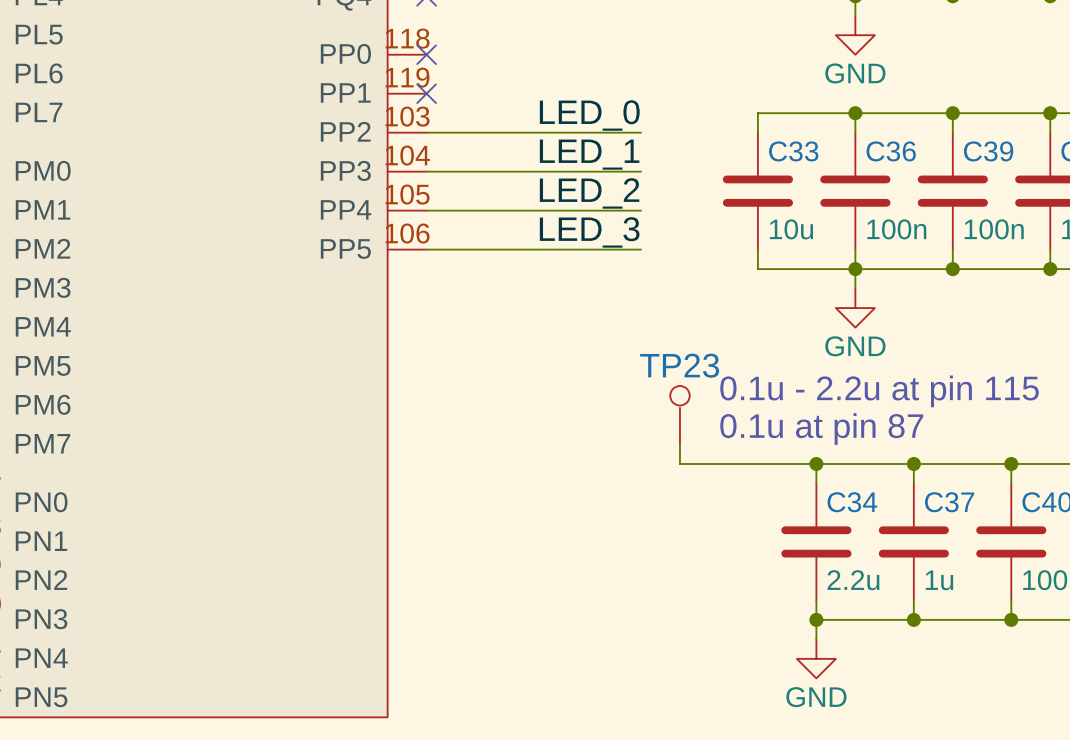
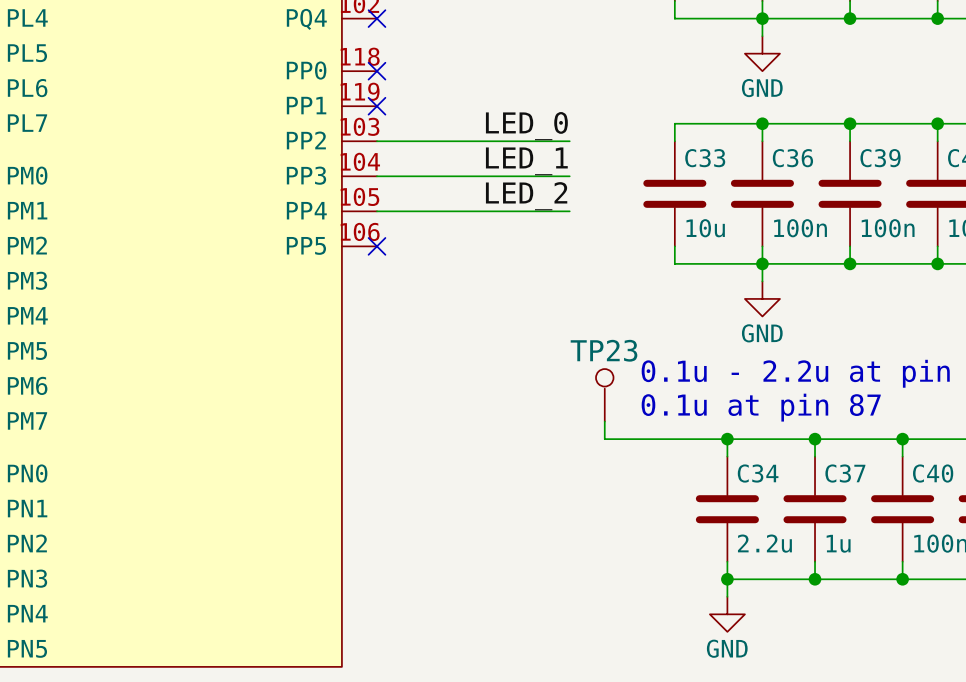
label: LED_3 (589, 232) -> none
wire: (426, 249) (641, 249) -> none
no-connect mark: none -> (376, 246)

